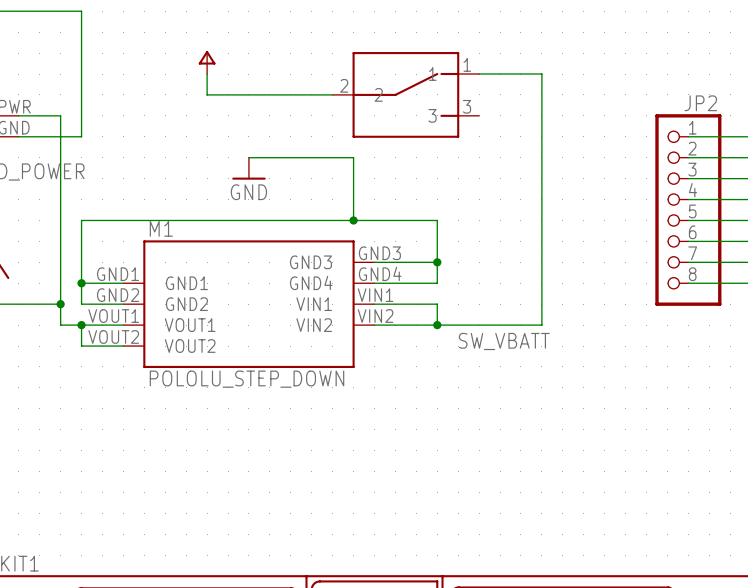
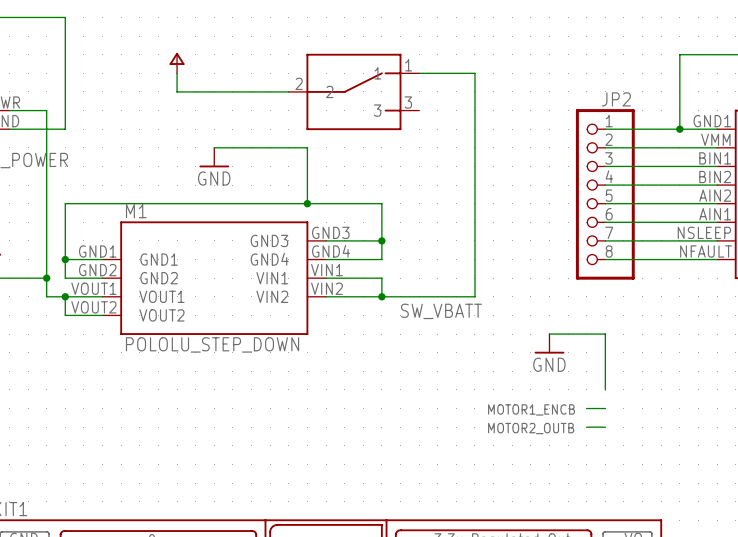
wire: none -> (549, 334) (605, 334) (605, 389)
power symbol: none -> GND (549, 343)
wire: none -> (586, 408) (605, 408)
label: none -> MOTOR1_ENCB (531, 409)
wire: none -> (586, 427) (605, 427)
label: none -> MOTOR2_OUTB (531, 428)

